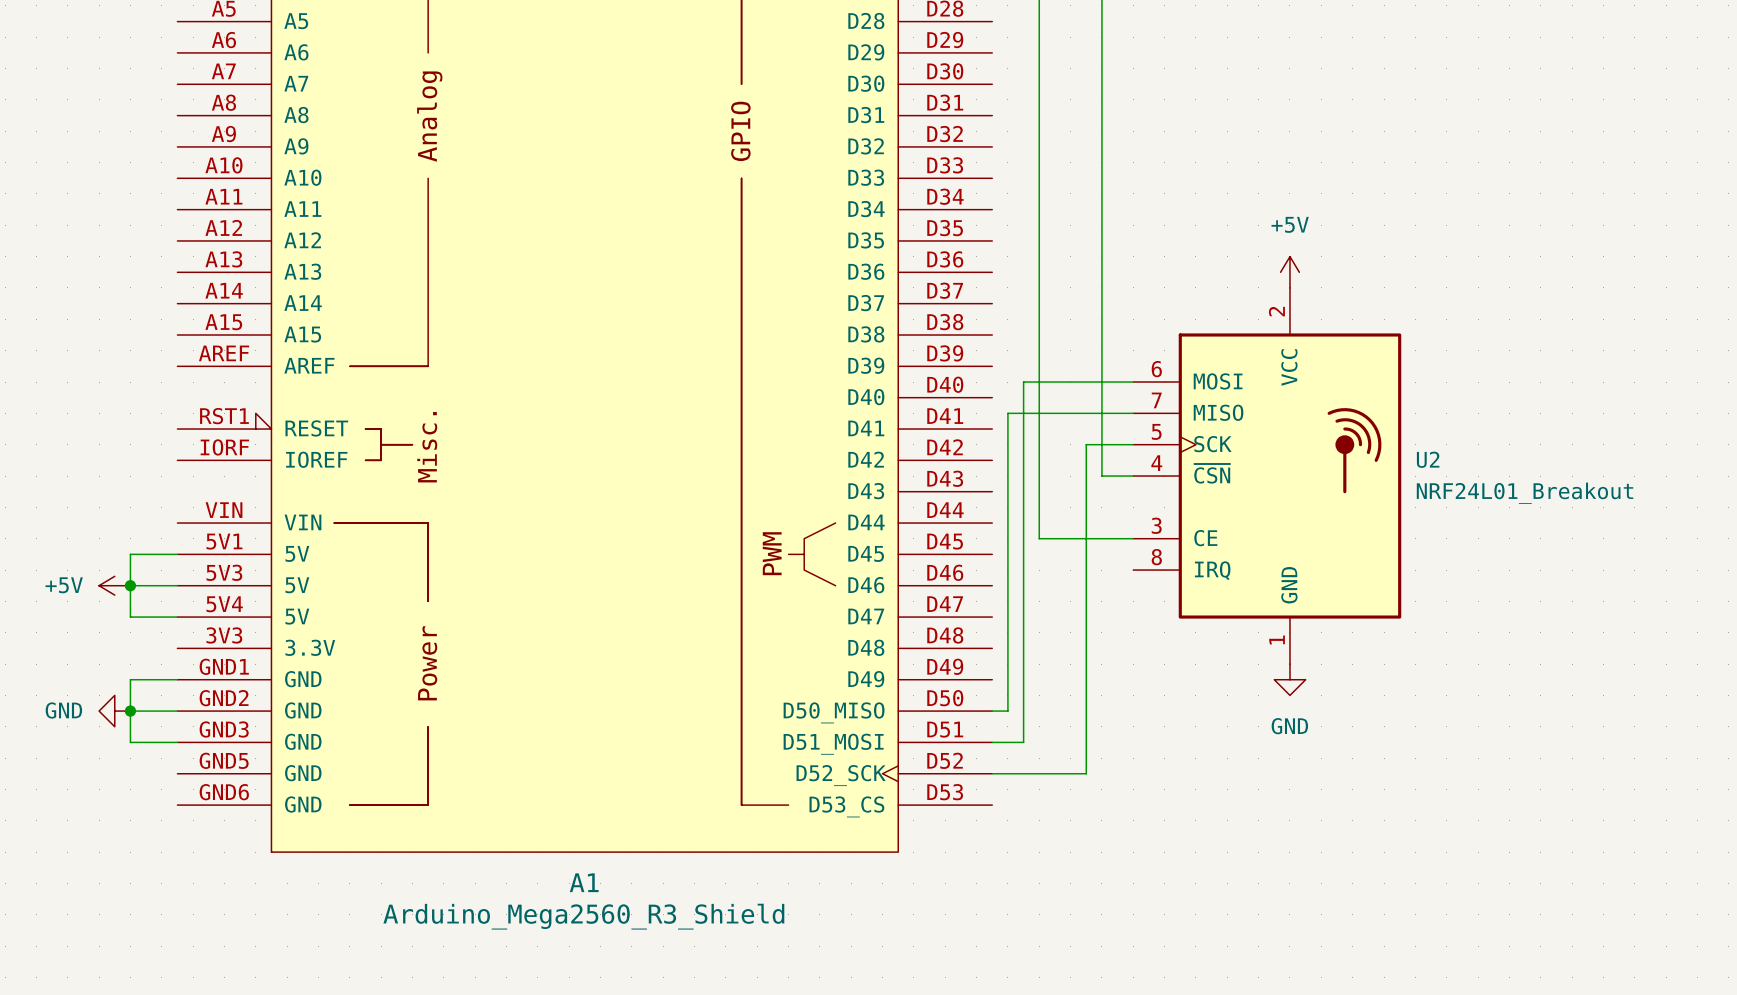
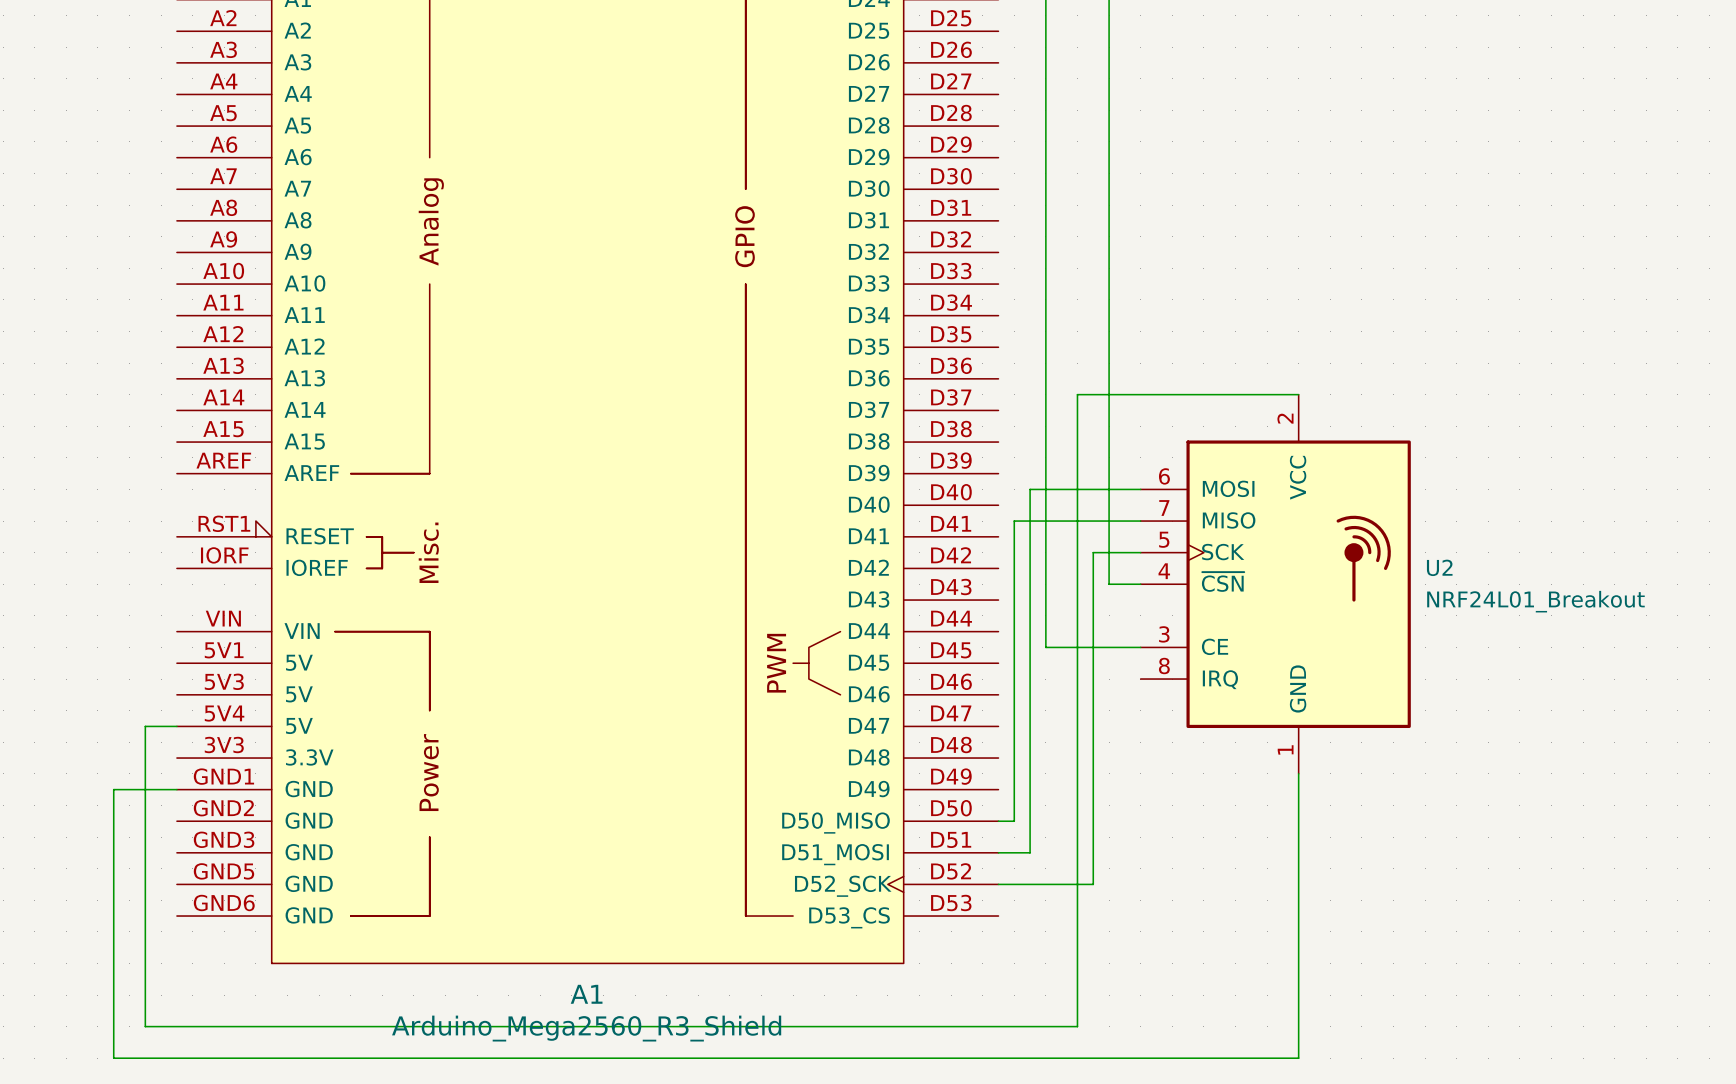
power symbol: +5V (1289, 272) -> none
wire: (177, 554) (130, 554) (130, 617) (146, 617) -> (1298, 394) (1077, 394) (1077, 1026) (145, 1026) (145, 726)
power symbol: +5V (114, 585) -> none
wire: (130, 585) (177, 585) -> none
junction: (130, 585) -> none
wire: (130, 679) (130, 742) (177, 742) -> (129, 789) (113, 789) (113, 1058) (1298, 1058) (1298, 773)
power symbol: GND (1289, 679) -> none
power symbol: GND (114, 711) -> none
wire: (130, 711) (177, 711) -> none
junction: (130, 711) -> none

